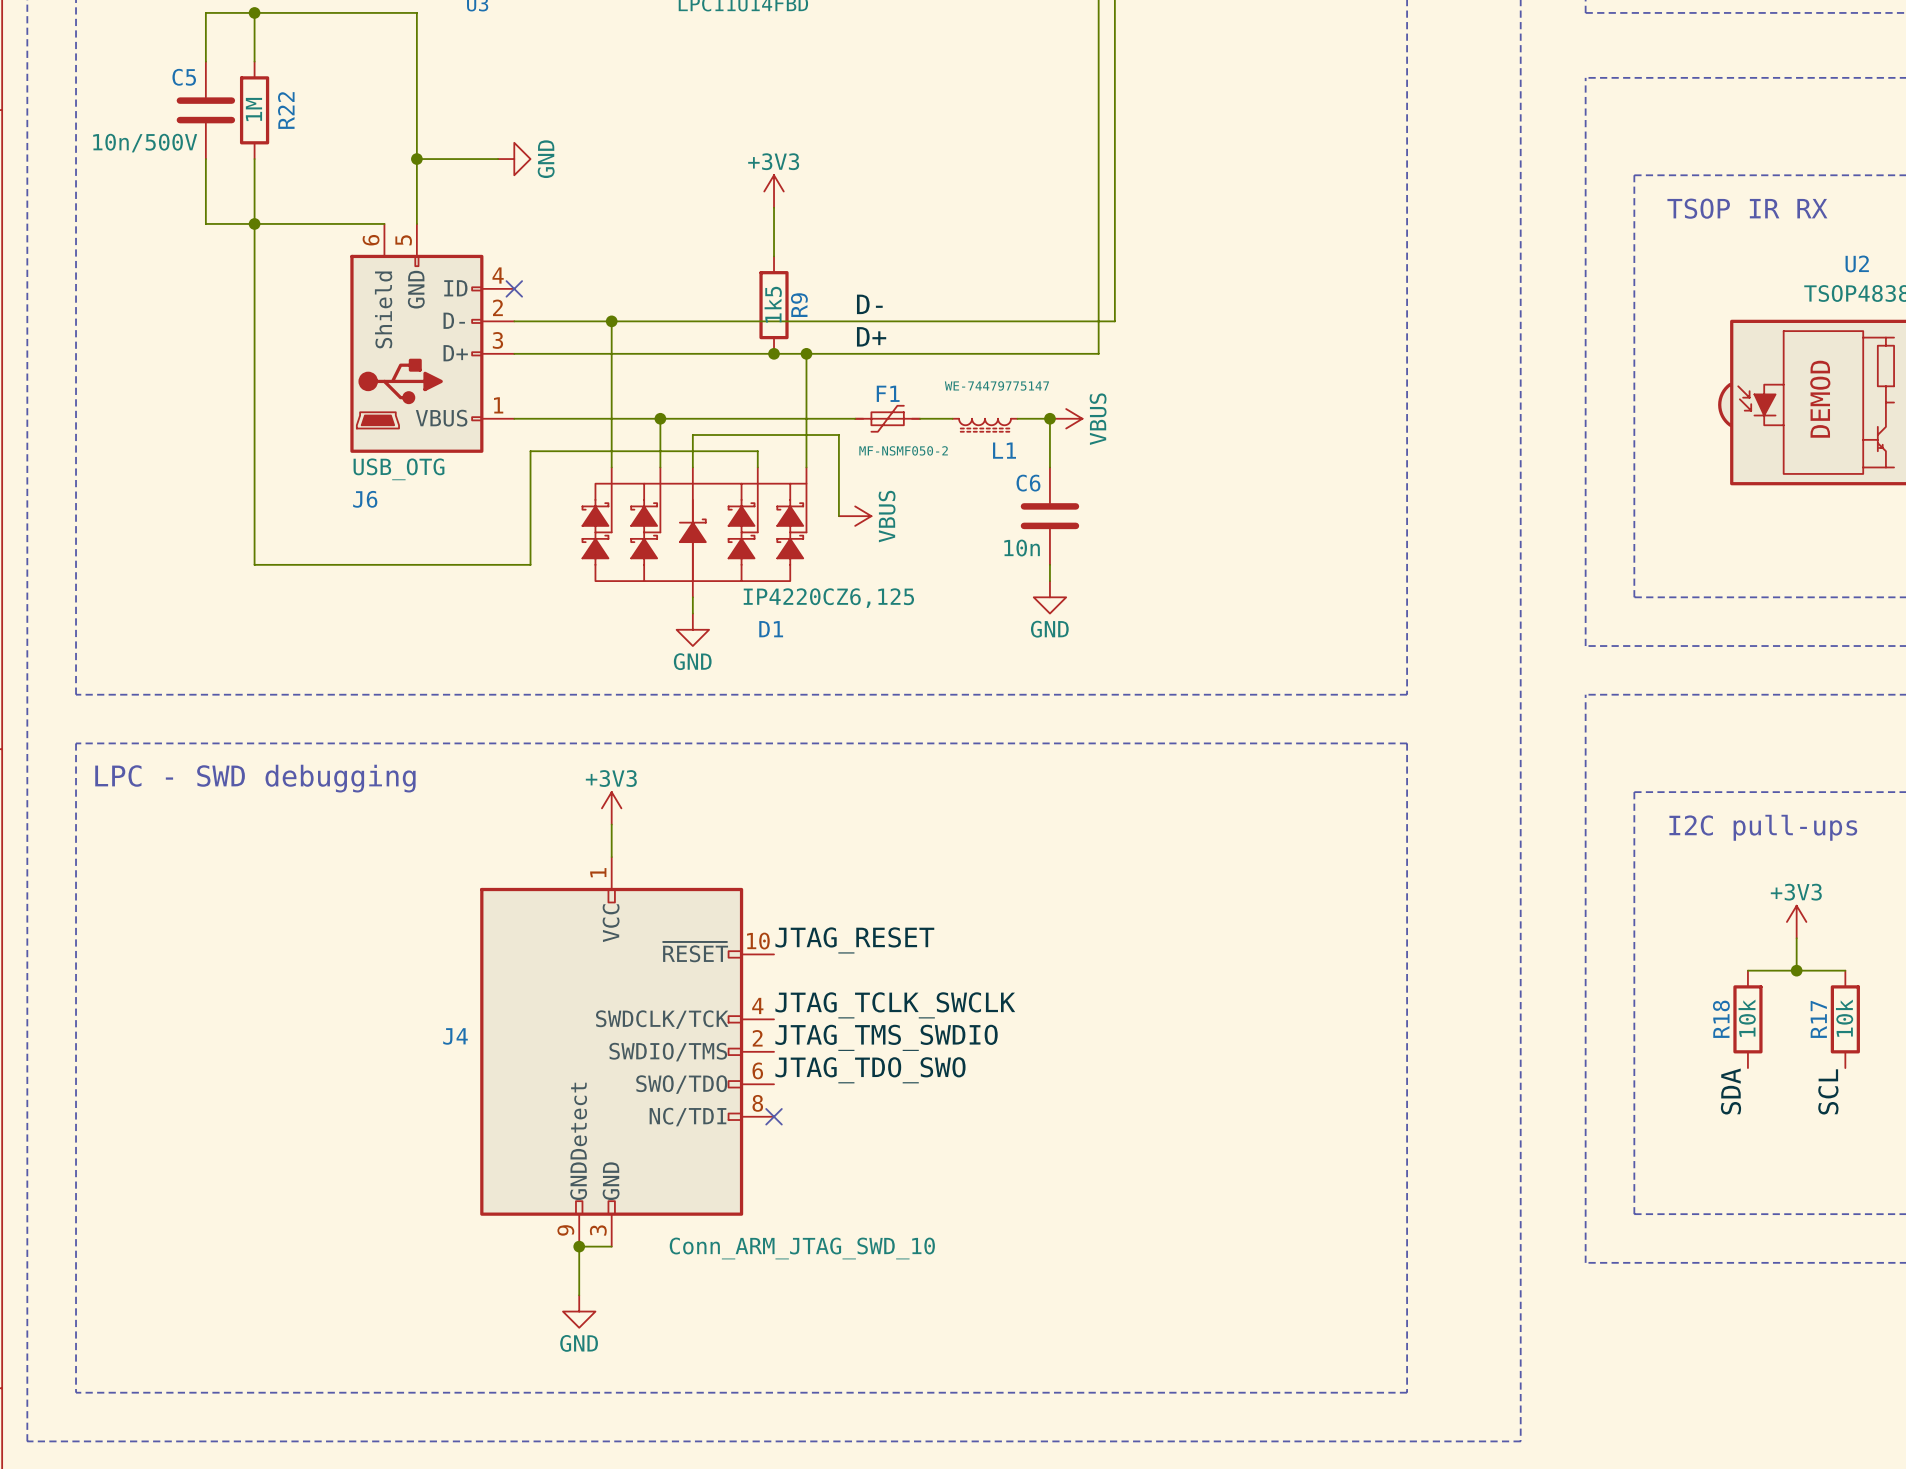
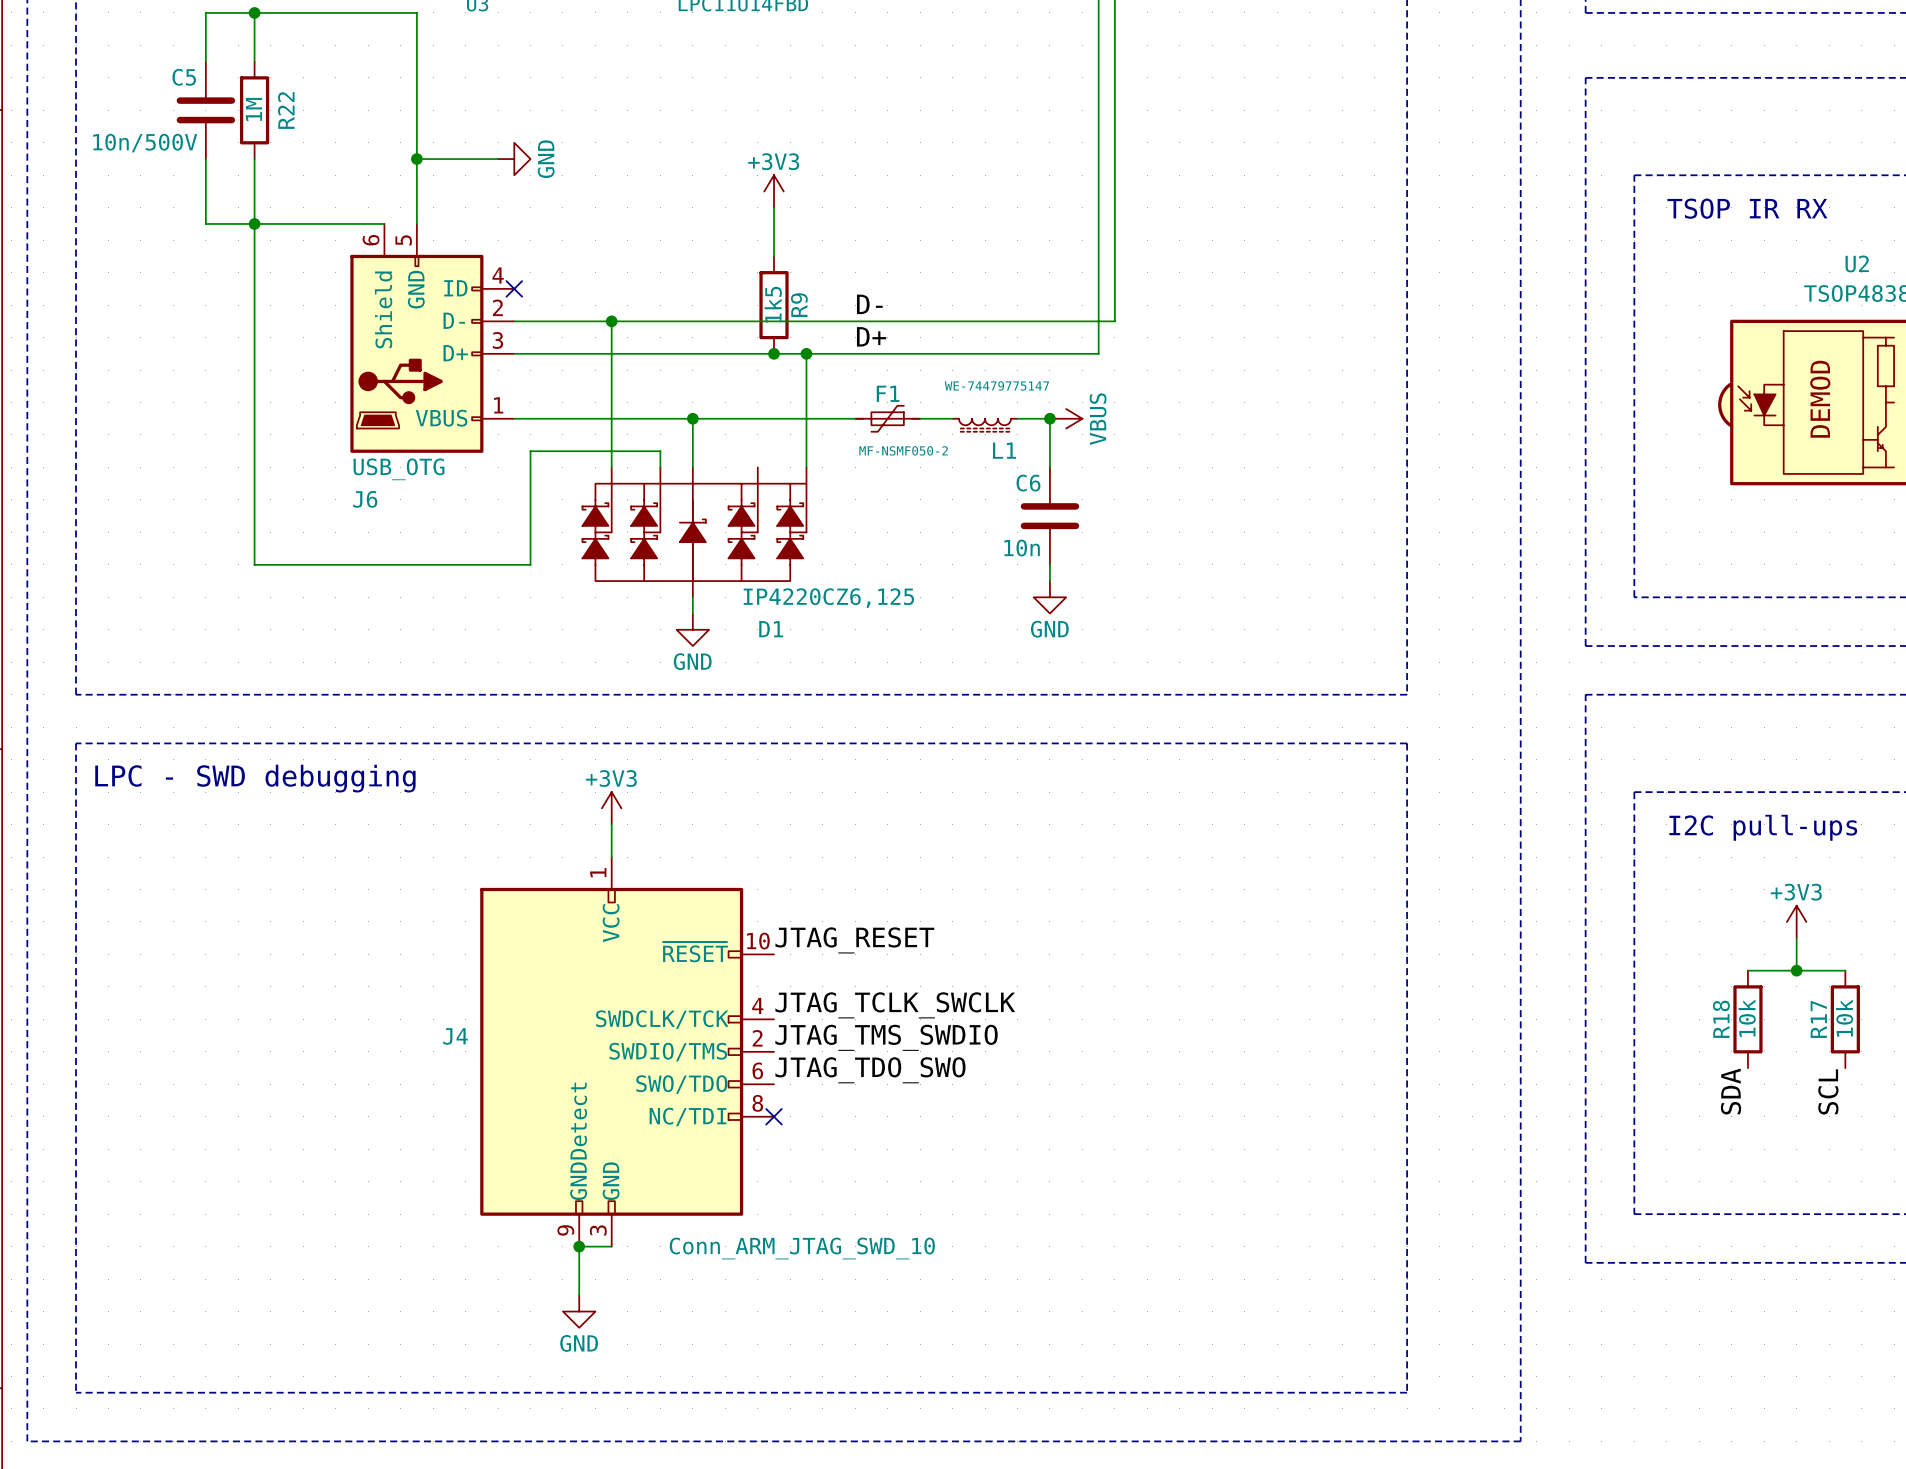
wire: (660, 418) (660, 451) (757, 451) (757, 467) -> none
junction position: (660, 418) -> (692, 418)
wire: (692, 434) (838, 434) (838, 516) -> (692, 434) (692, 418)
power symbol: VBUS (855, 516) -> none

